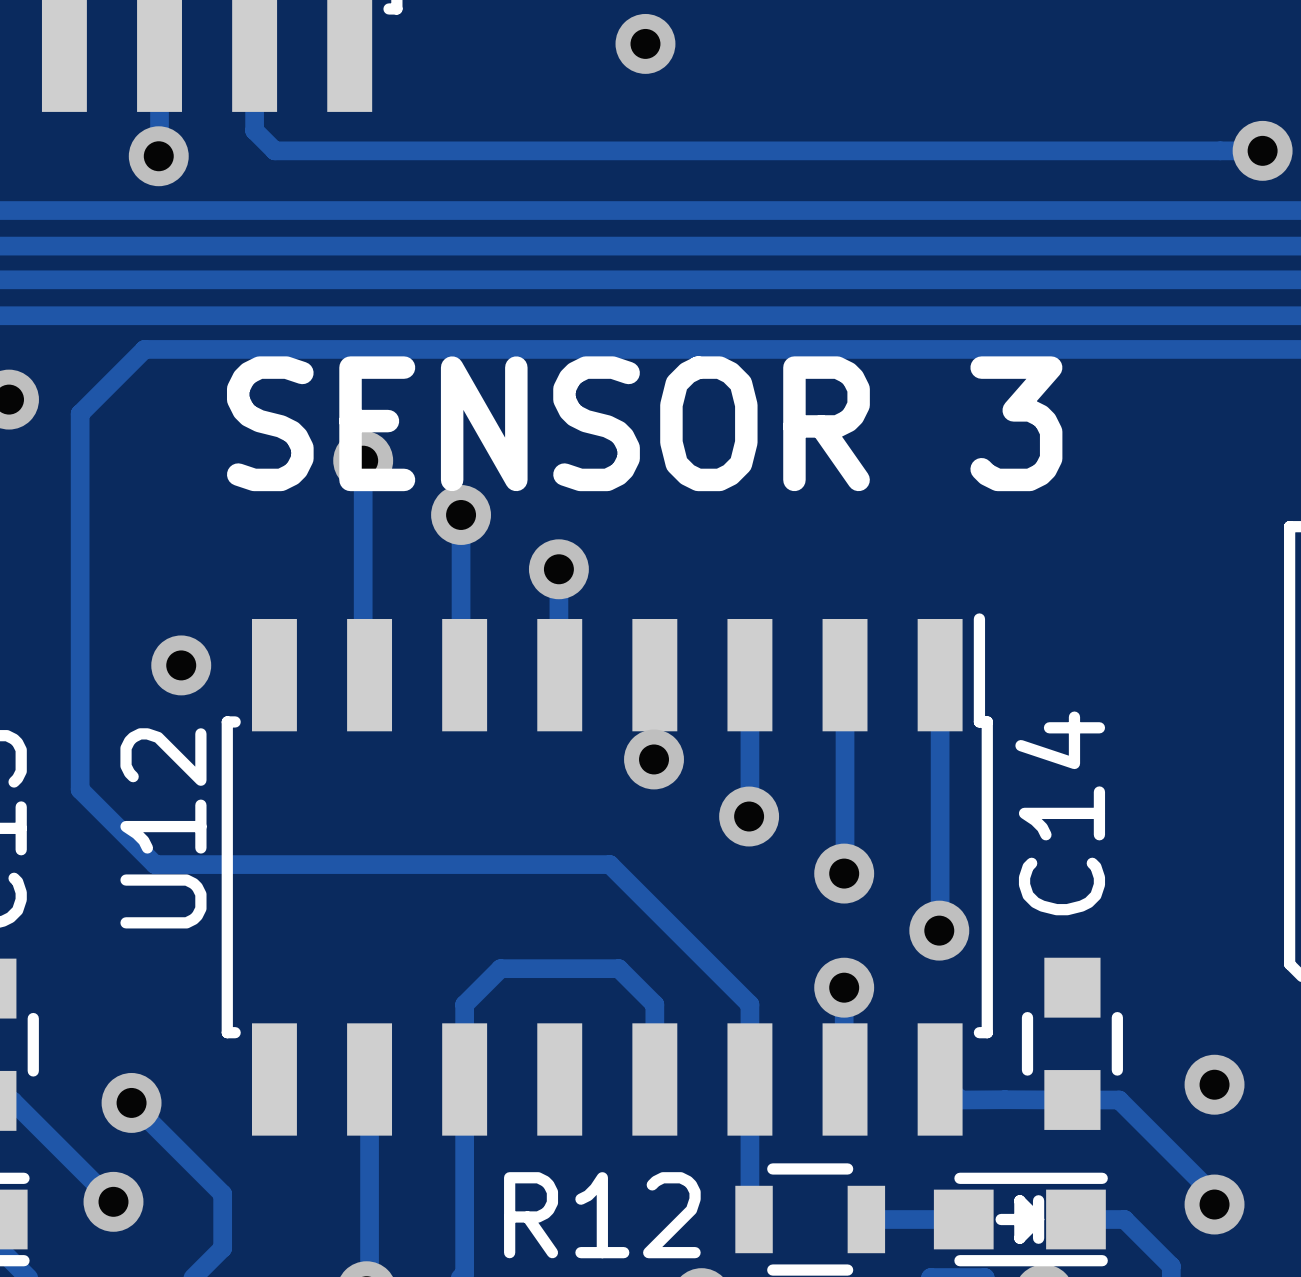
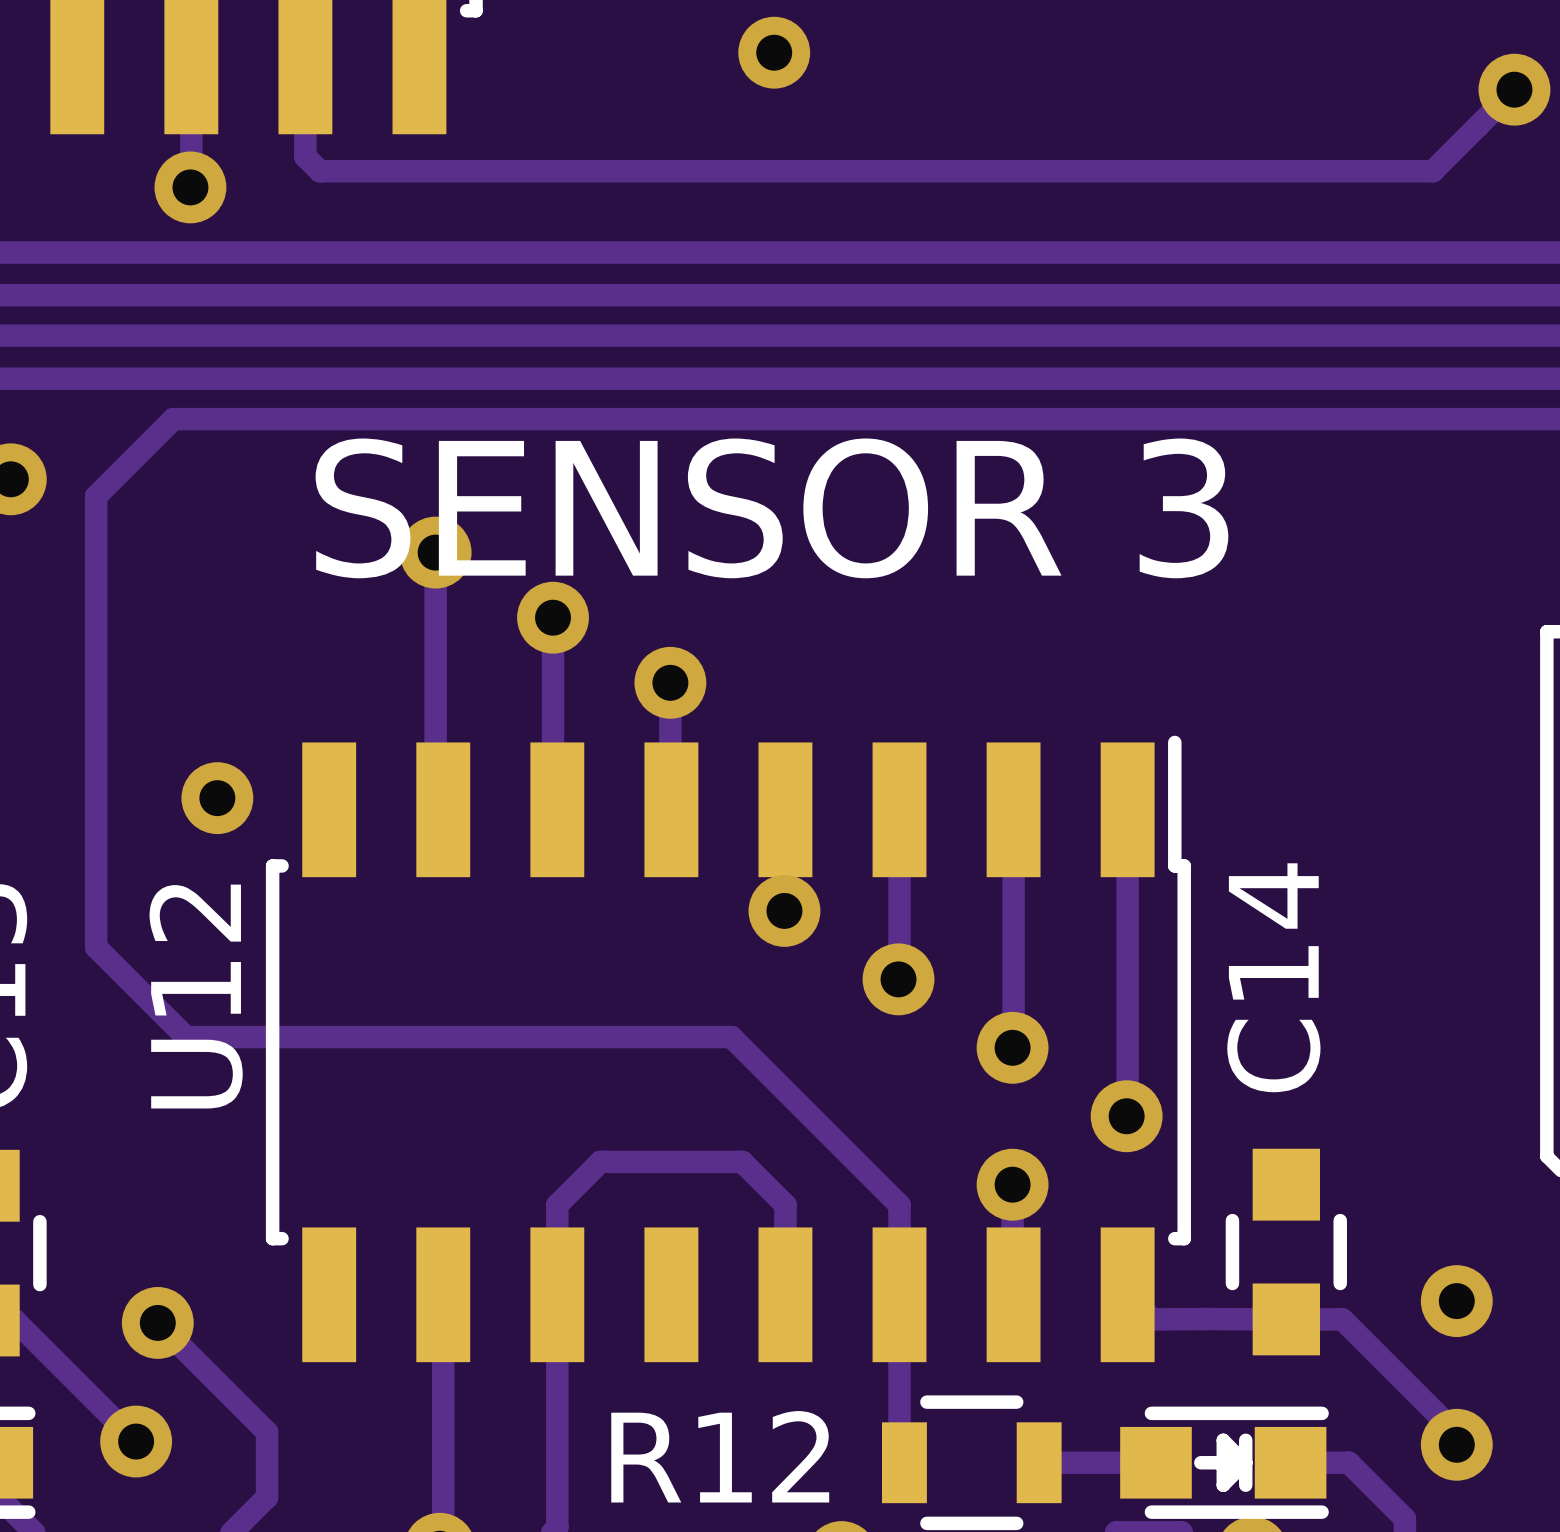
via: none -> (1514, 89)
track: (266, 142) (274, 150) (1262, 150) -> (319, 171) (1432, 171) (1514, 89)
via: (1262, 150) -> none

